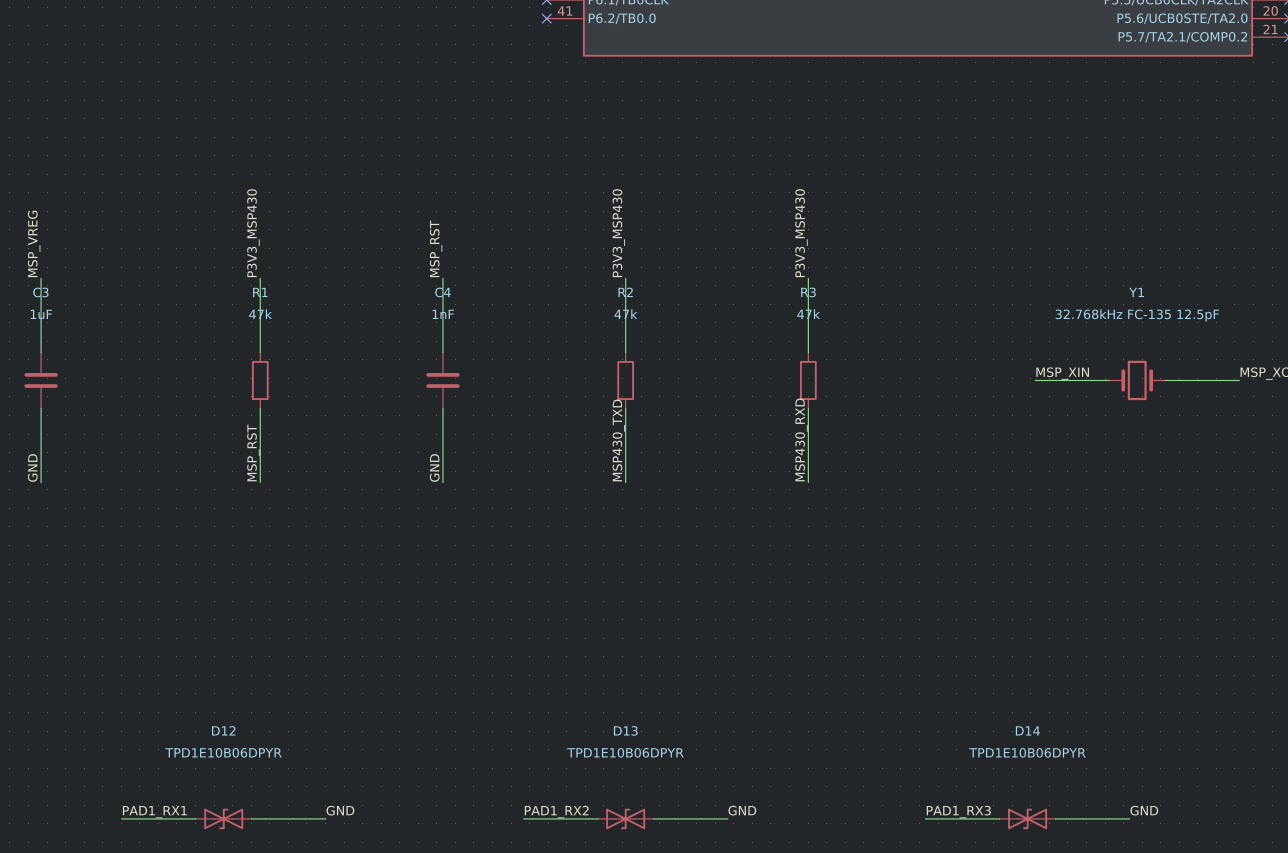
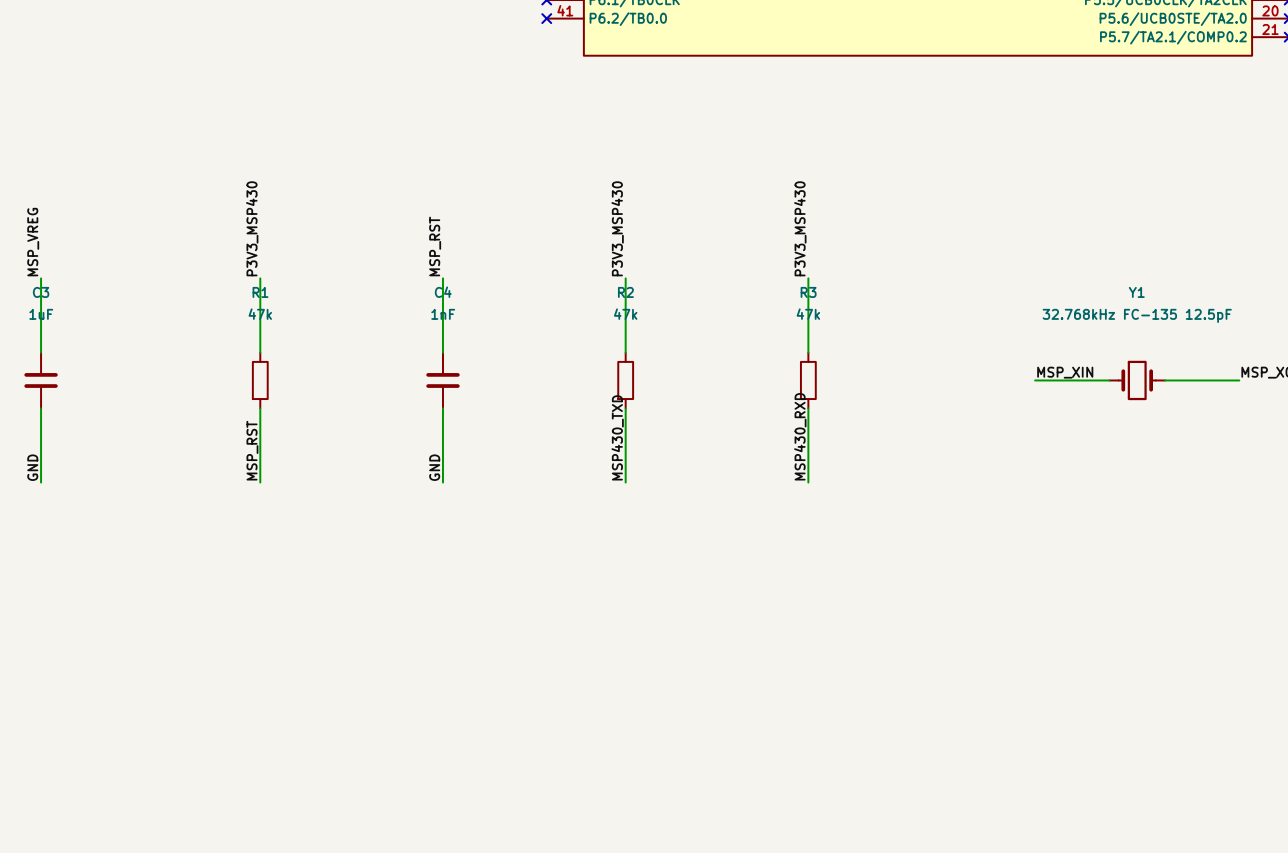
label: GND (340, 810) -> none
label: GND (742, 810) -> none
label: GND (1144, 810) -> none
label: PAD1_RX1 (154, 812) -> none
label: PAD1_RX2 (556, 812) -> none
label: PAD1_RX3 (958, 812) -> none
wire: (121, 818) (195, 818) -> none
D12: TPD1E10B06DPYR (223, 818) -> none
wire: (251, 818) (325, 818) -> none
wire: (523, 818) (597, 818) -> none
D13: TPD1E10B06DPYR (625, 818) -> none
wire: (653, 818) (727, 818) -> none
wire: (925, 818) (999, 818) -> none
D14: TPD1E10B06DPYR (1027, 818) -> none
wire: (1055, 818) (1129, 818) -> none

